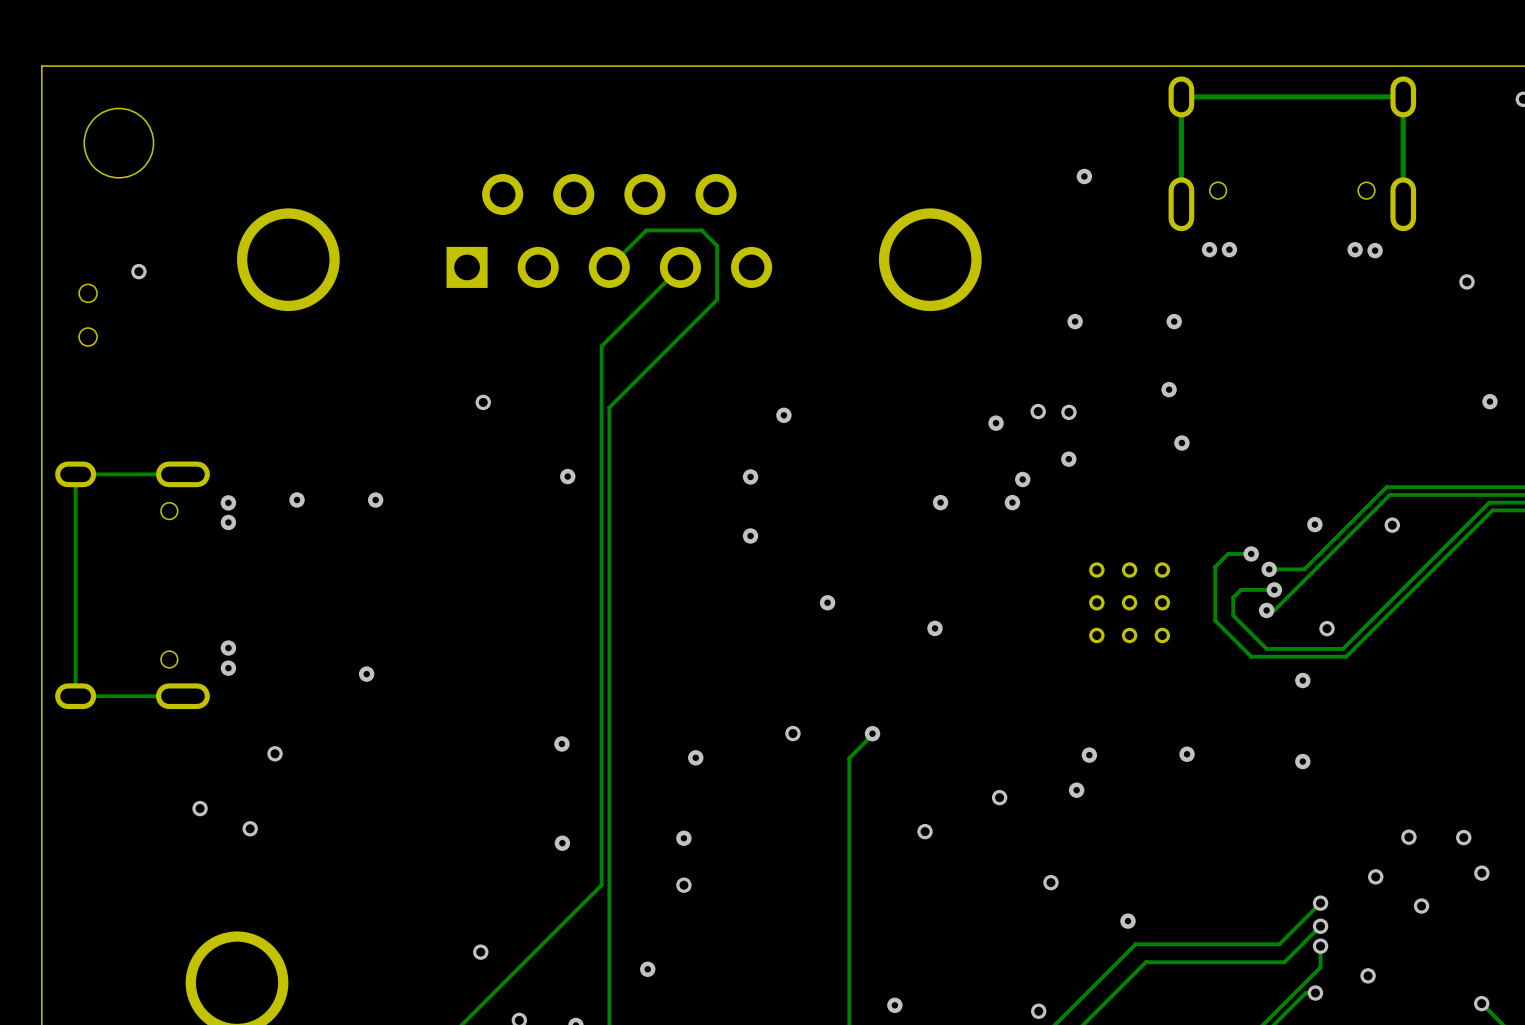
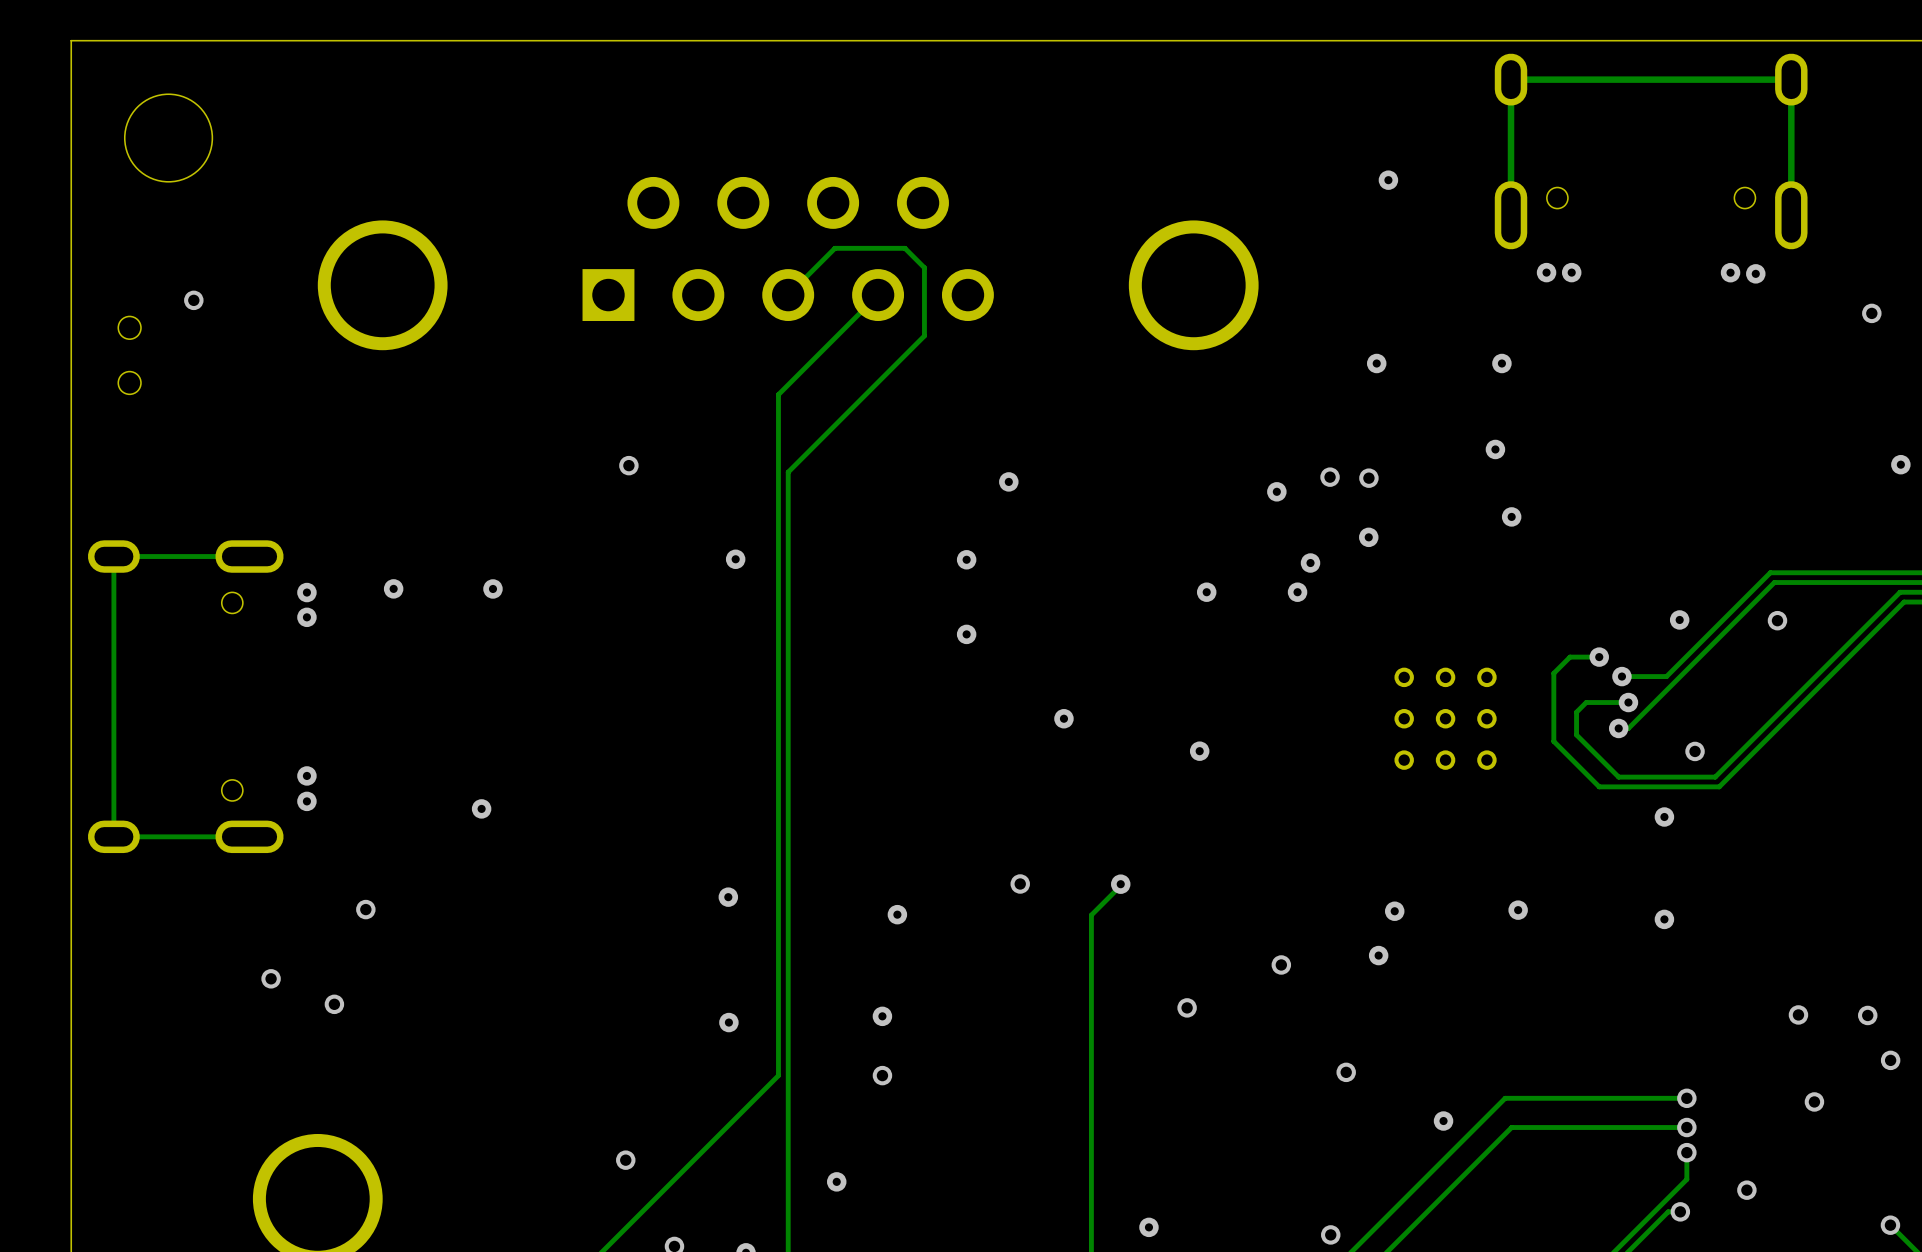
via: (1375, 876) -> none
track: (1320, 903) (1279, 944) (1135, 944) -> (1686, 1098) (1505, 1098) (1453, 1150)
track: (1320, 926) (1284, 962) (1145, 962) -> (1686, 1127) (1511, 1127) (1466, 1172)

